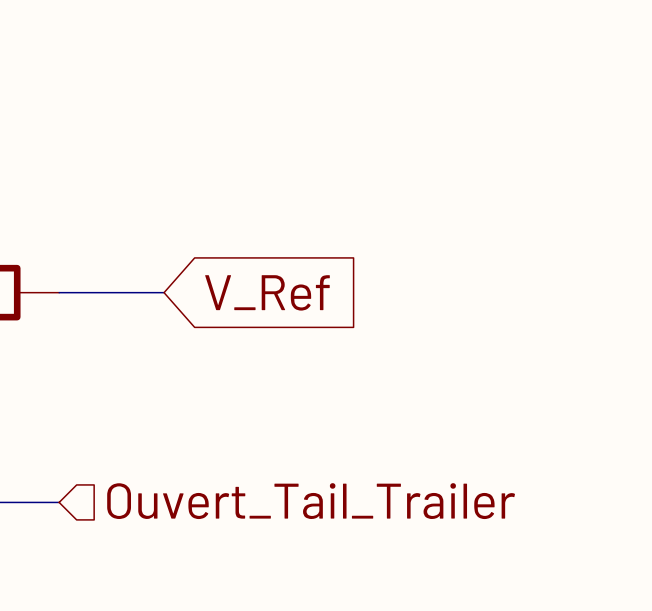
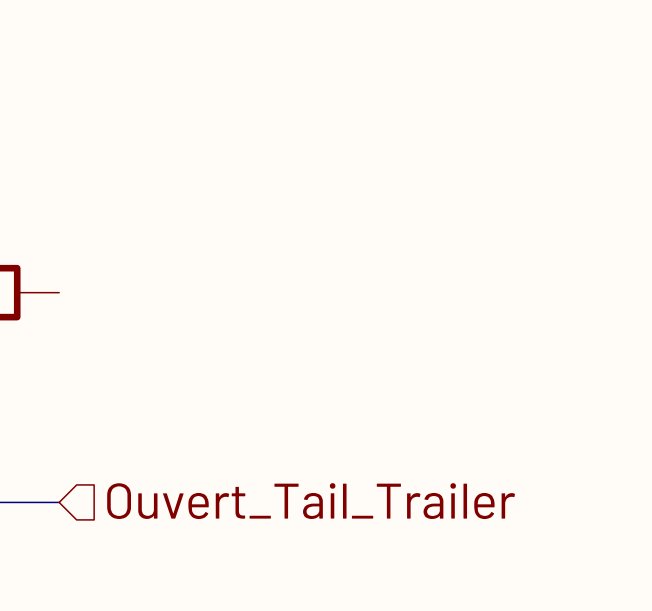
wire: (59, 292) (164, 292) -> none
global label: V_Ref (267, 292) -> none

